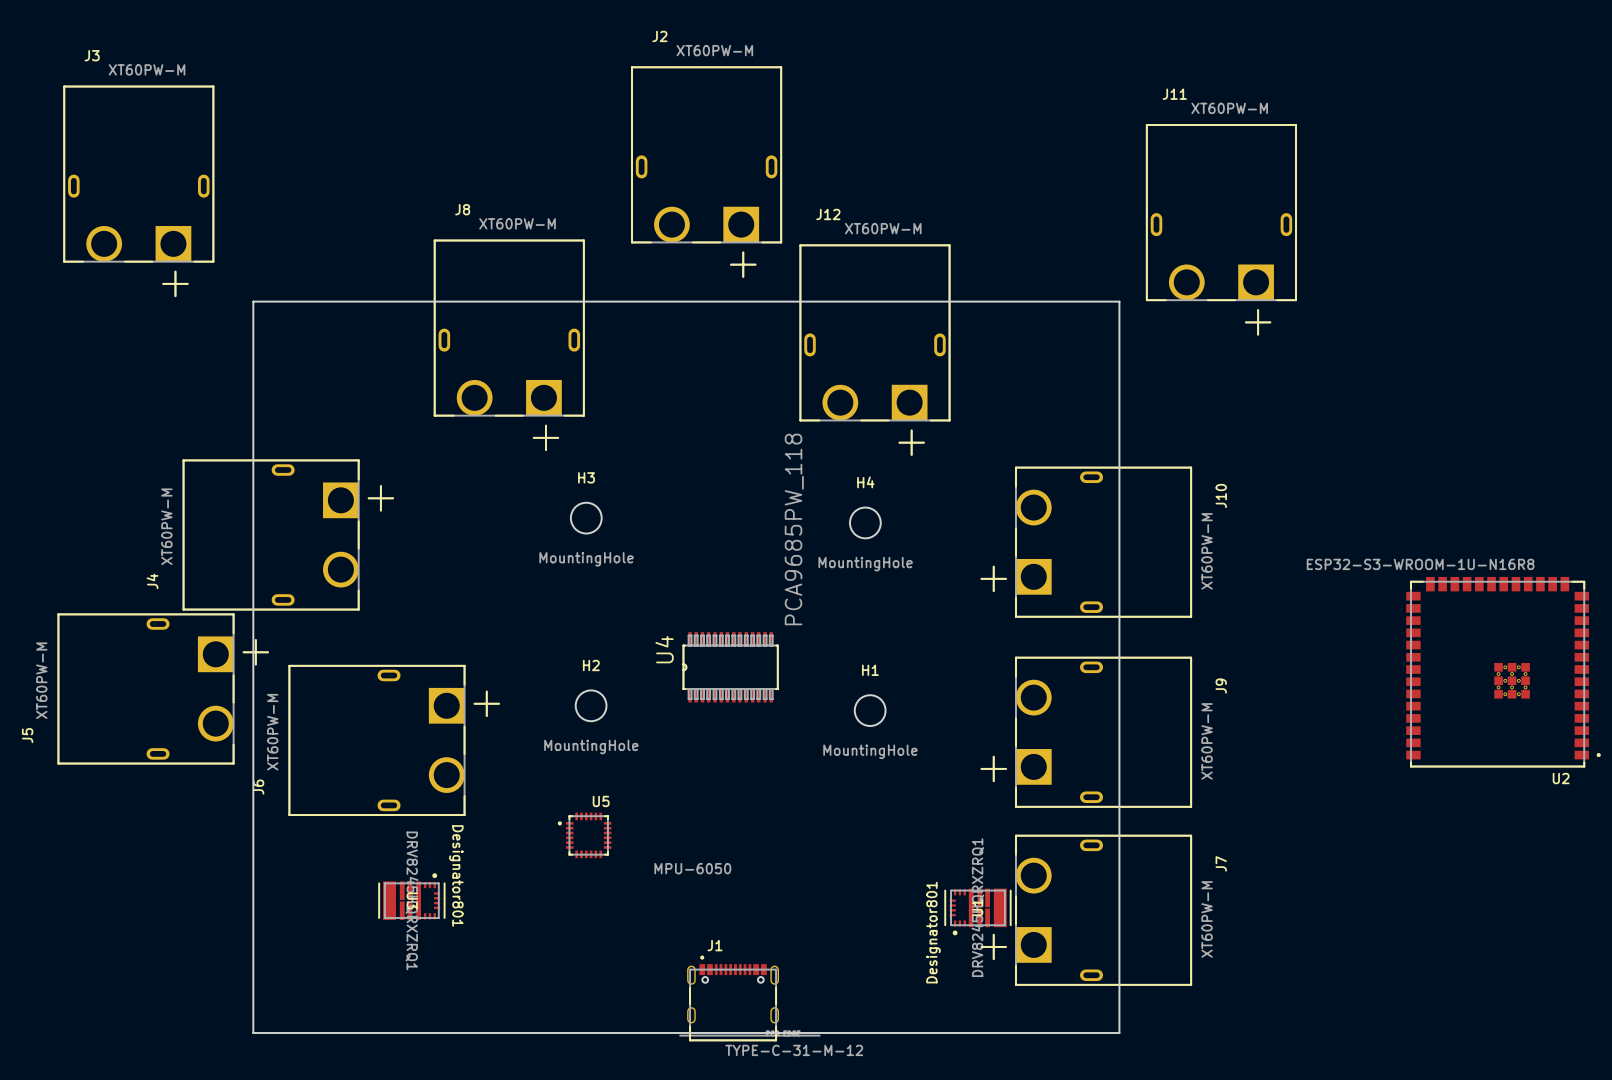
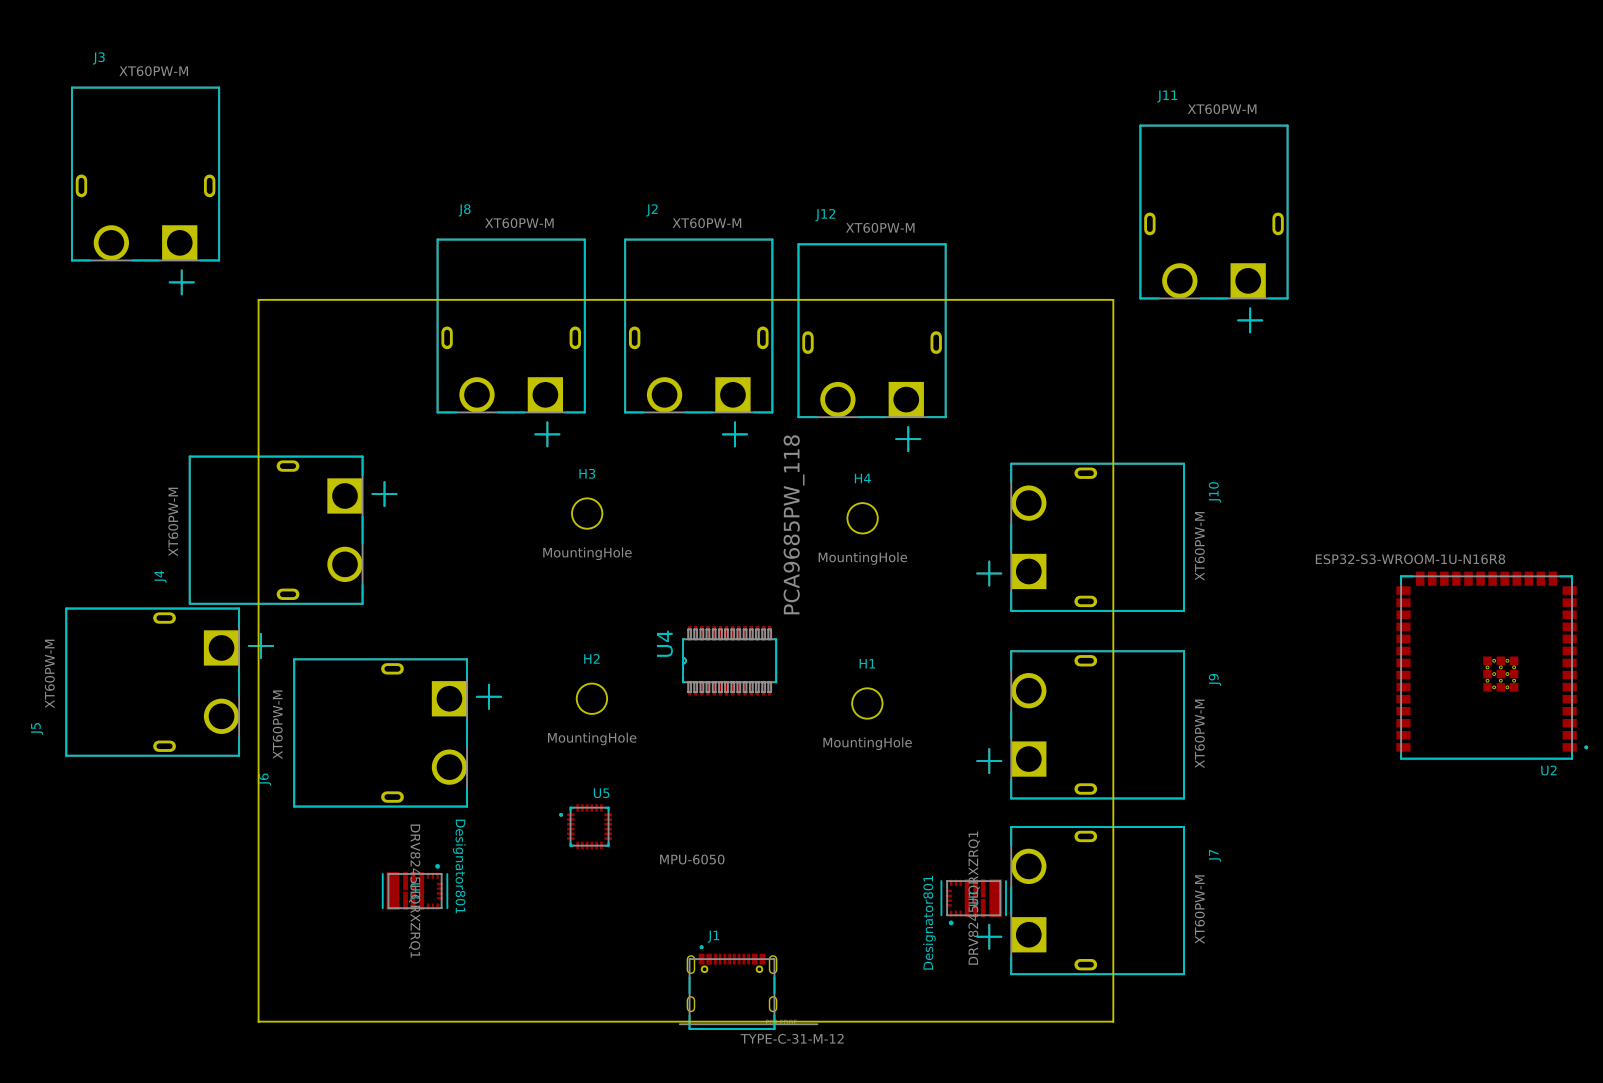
J2 position: (706, 172) -> (698, 342)

